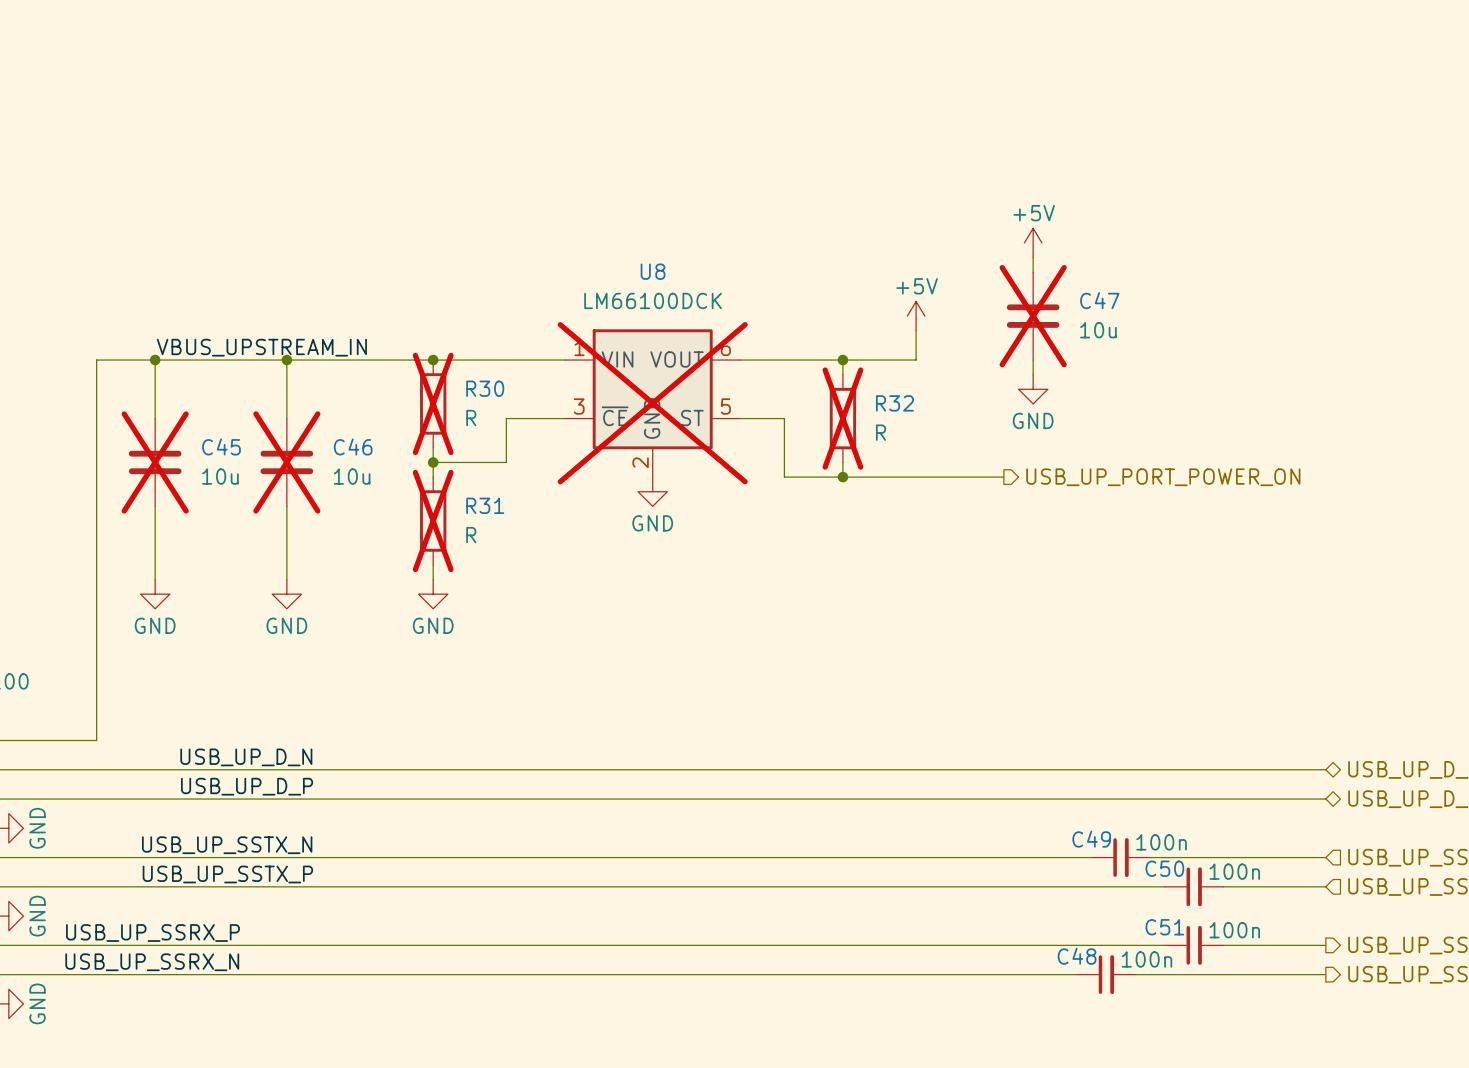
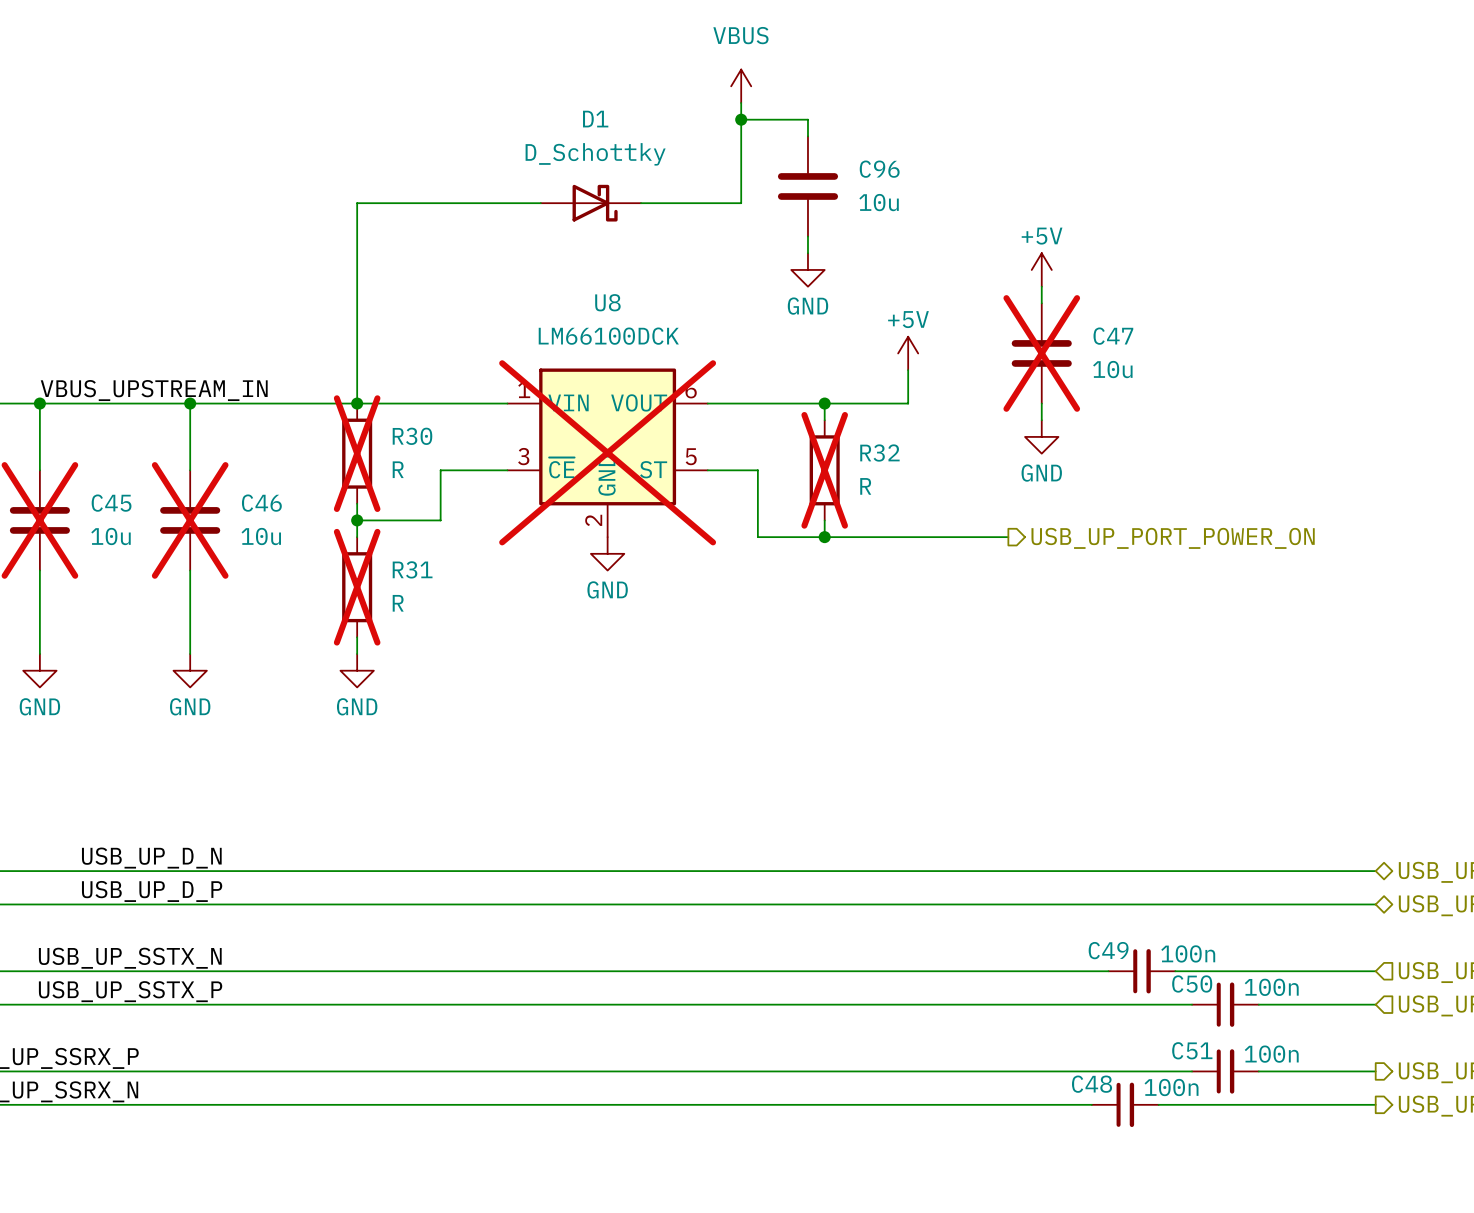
power symbol: none -> VBUS (741, 86)
wire: none -> (741, 102) (741, 203) (641, 203)
wire: none -> (741, 119) (807, 119) (807, 136)
junction: none -> (741, 119)
C96: none -> 10u (807, 186)
wire: none -> (540, 203) (357, 203) (357, 403)
D1: none -> D_Schottky (590, 203)
wire: none -> (807, 236) (807, 253)
power symbol: none -> GND (807, 269)

